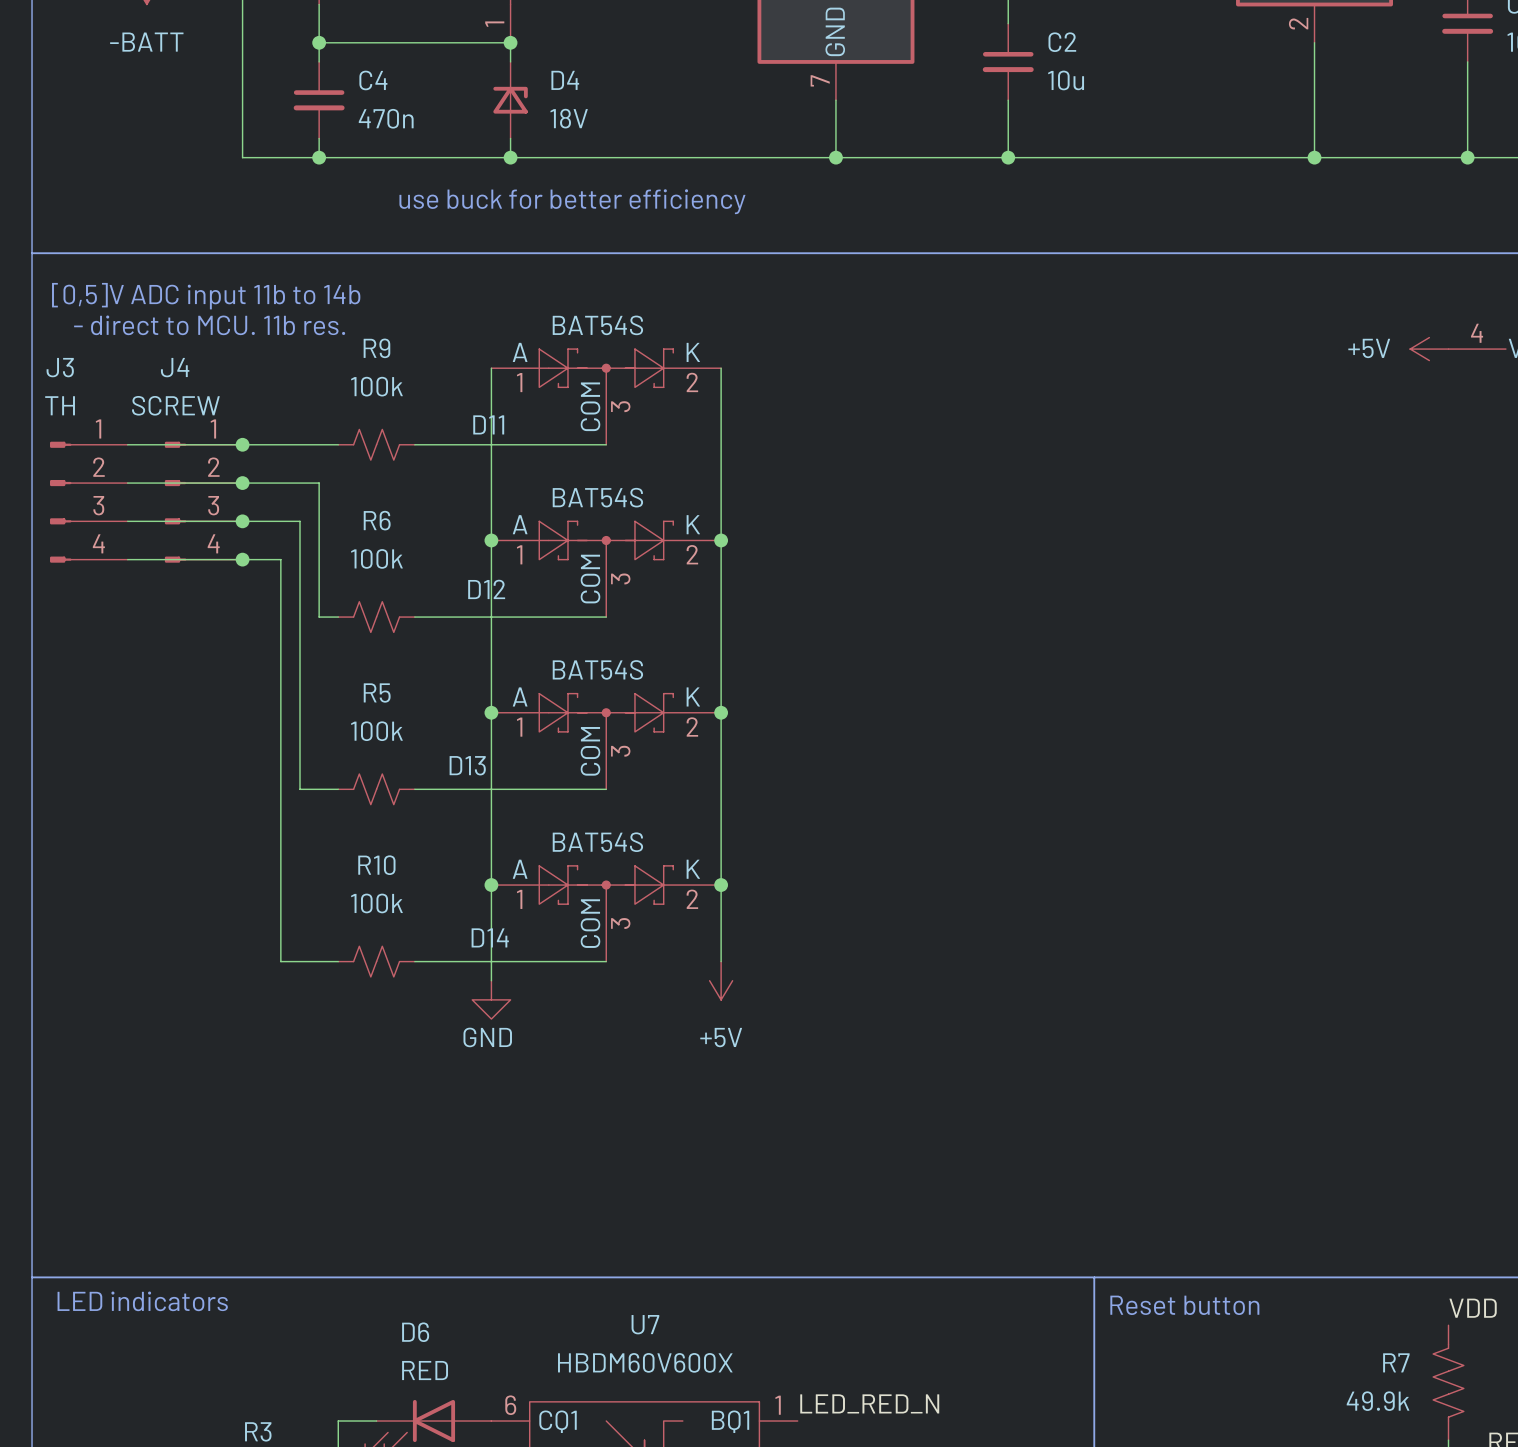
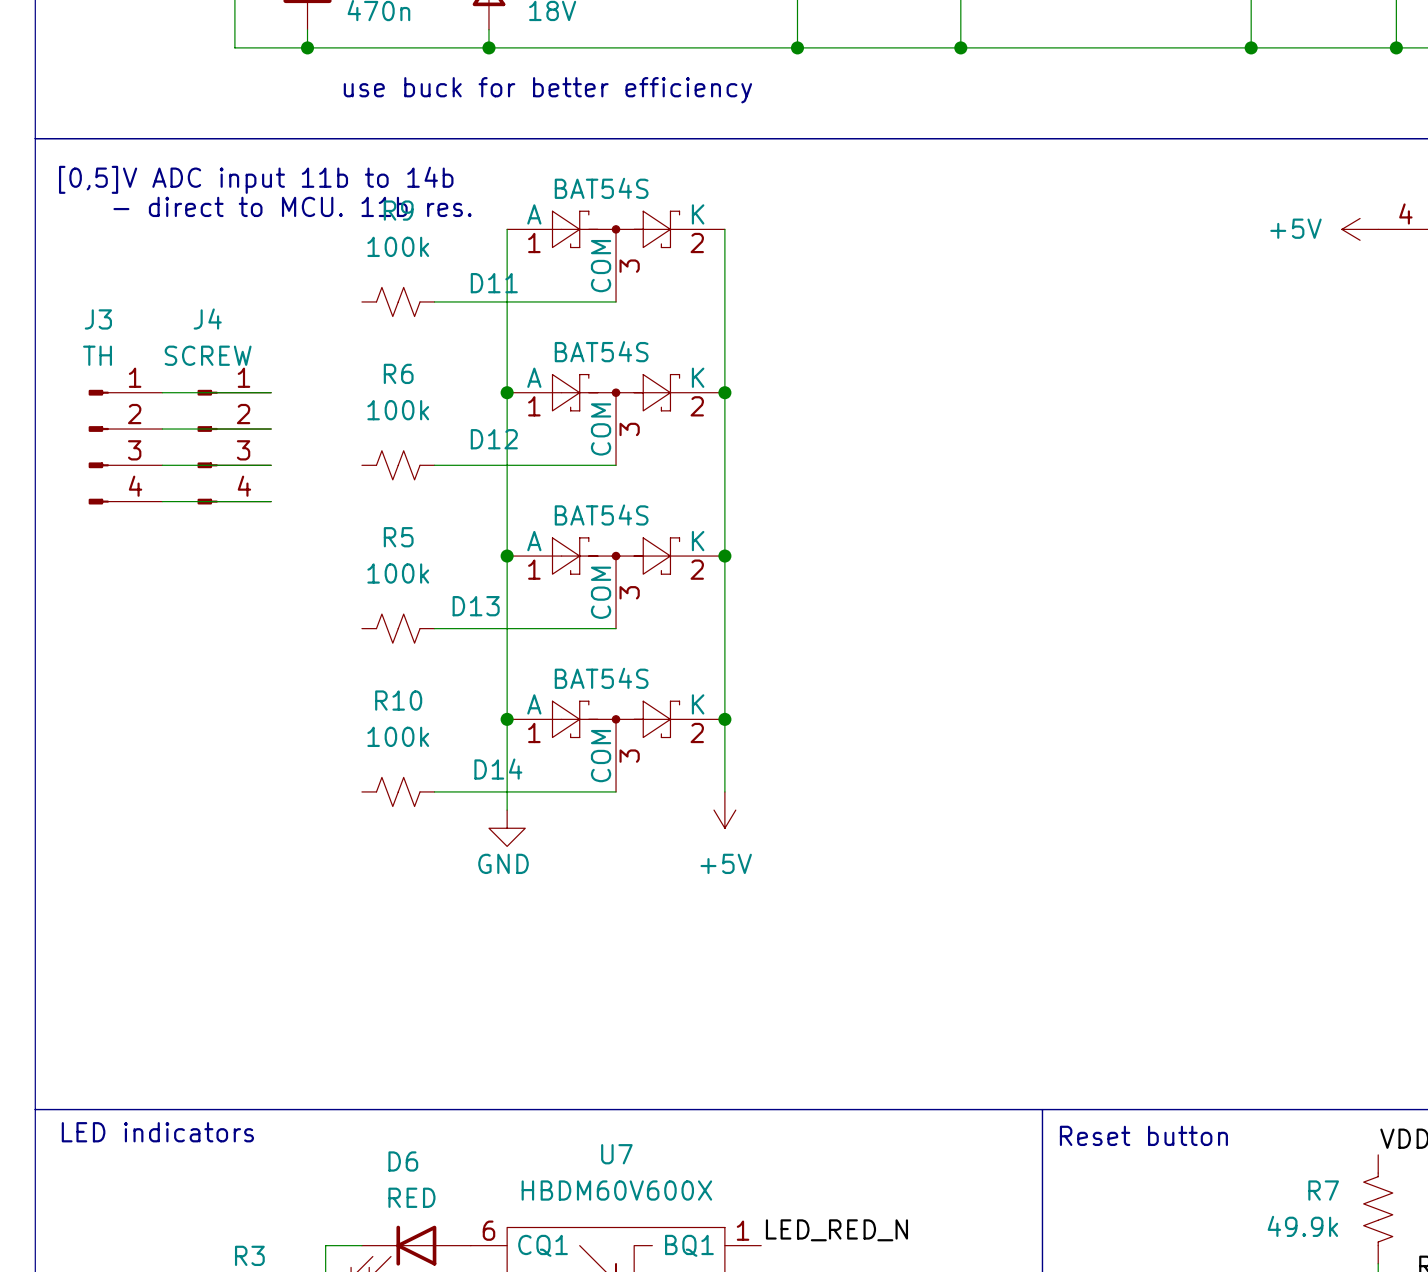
wire: (491, 368) (491, 980) -> (507, 229) (507, 810)
wire: (721, 368) (721, 961) -> (724, 229) (724, 791)
D11 position: (606, 396) -> (616, 256)
wire: (127, 444) (338, 444) -> none
junction: (242, 444) -> none
R9 position: (376, 444) -> (398, 301)
wire: (414, 444) (606, 444) -> (434, 301) (616, 301)
wire: (127, 483) (319, 483) (319, 617) (338, 617) -> none
junction: (242, 483) -> none
J3 position: (88, 502) -> (125, 447)
J4 position: (203, 502) -> (234, 447)
junction: (242, 521) -> none
wire: (280, 521) (300, 521) (300, 789) (338, 789) -> none
junction position: (491, 540) -> (507, 392)
junction position: (721, 540) -> (724, 392)
junction: (242, 559) -> none
wire: (280, 559) (280, 961) (338, 961) -> none
D12 position: (606, 569) -> (616, 419)
wire: none -> (162, 465) (271, 465)
R6 position: (376, 617) -> (398, 465)
wire: (414, 617) (606, 617) -> (434, 465) (616, 465)
wire: none -> (162, 501) (271, 501)
junction position: (491, 712) -> (507, 556)
junction position: (721, 712) -> (724, 556)
D13 position: (606, 741) -> (616, 583)
R5 position: (376, 789) -> (398, 628)
wire: (414, 789) (606, 789) -> (434, 628) (616, 628)
junction position: (491, 885) -> (507, 719)
junction position: (721, 885) -> (724, 719)
D14 position: (606, 913) -> (616, 746)
R10 position: (376, 961) -> (398, 791)
wire: (414, 961) (606, 961) -> (434, 791) (616, 791)
power symbol position: +5V (721, 980) -> +5V (724, 810)
power symbol position: GND (491, 999) -> GND (507, 828)

